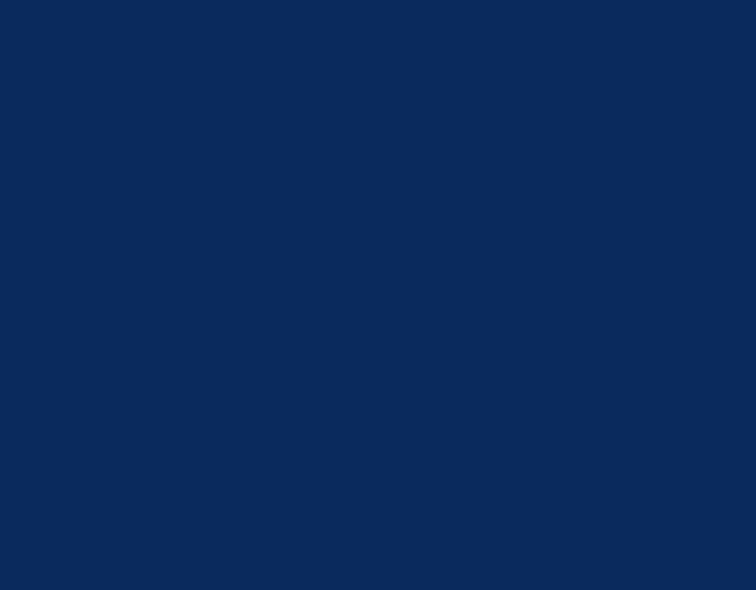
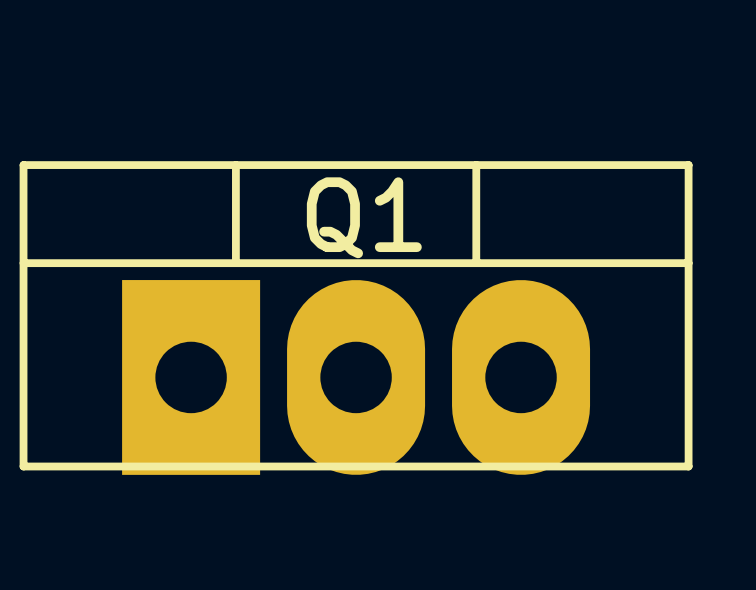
Q1: none -> (356, 318)

